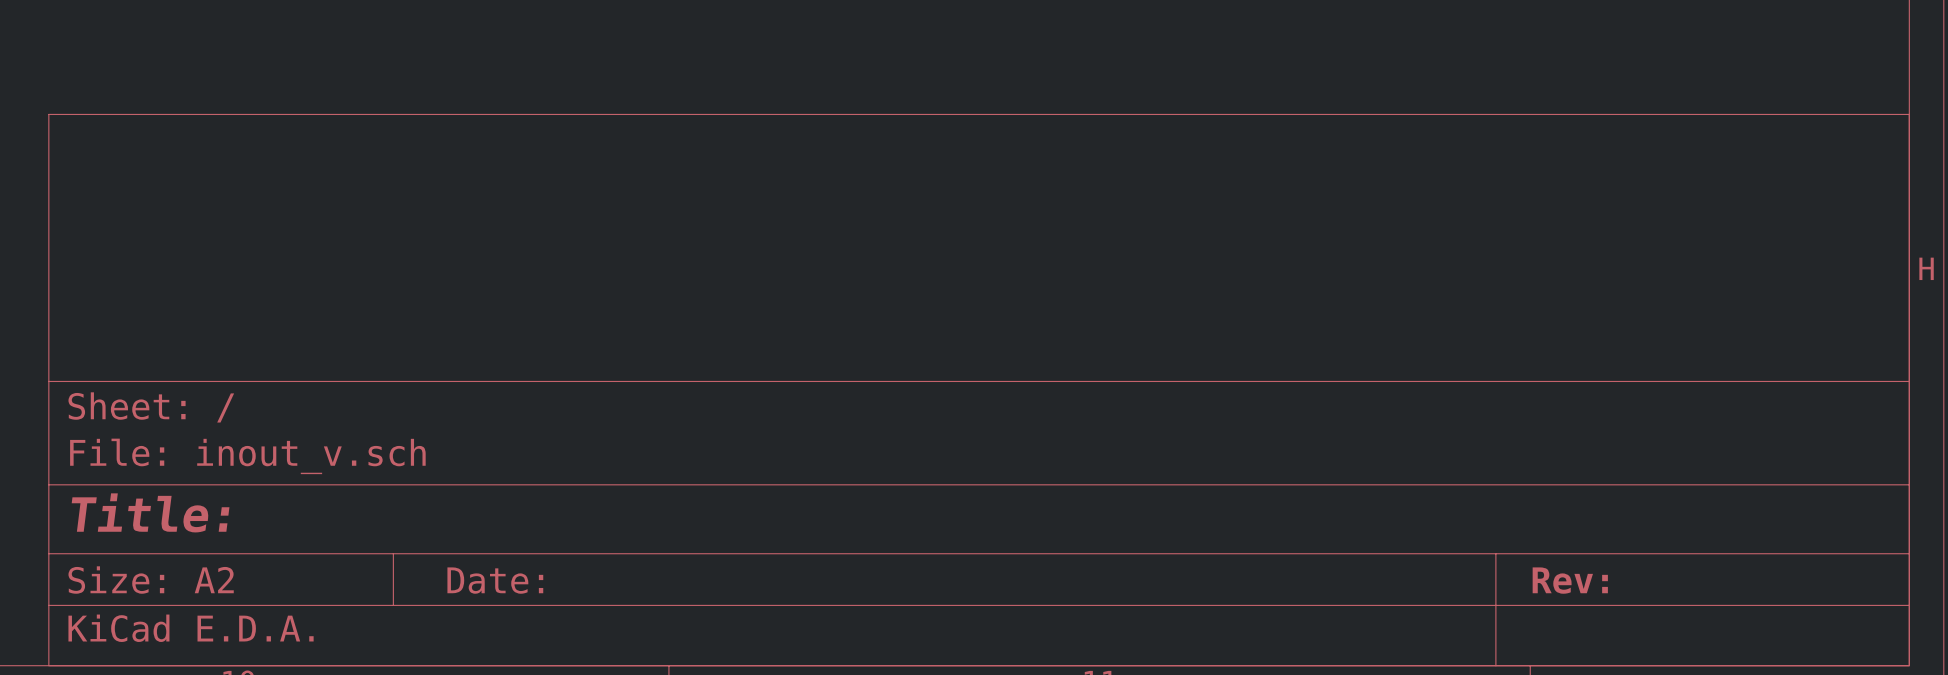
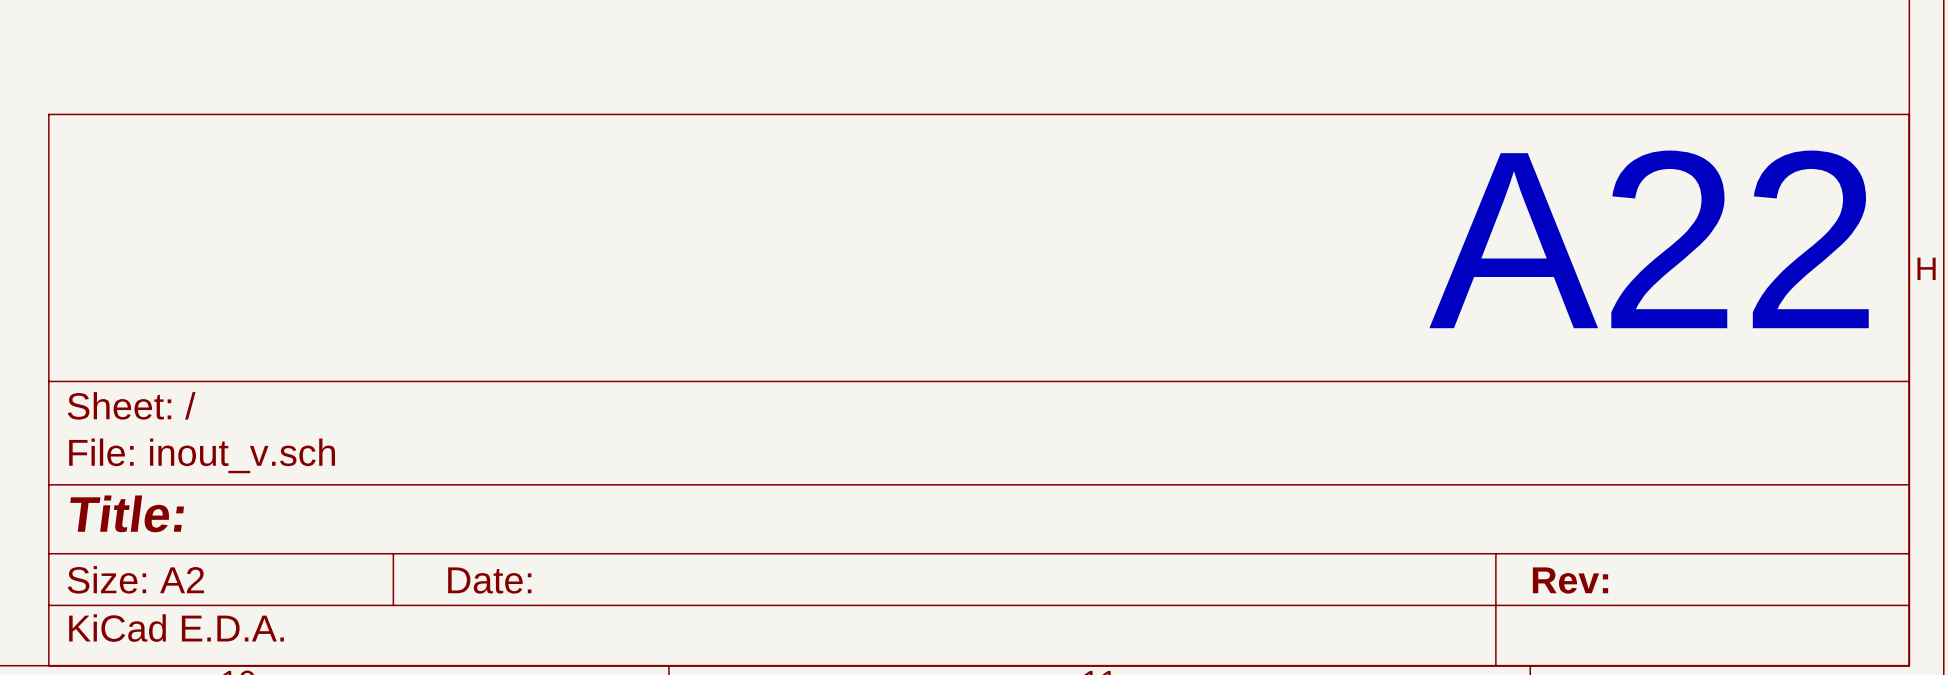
text: none -> A22 (1649, 239)

